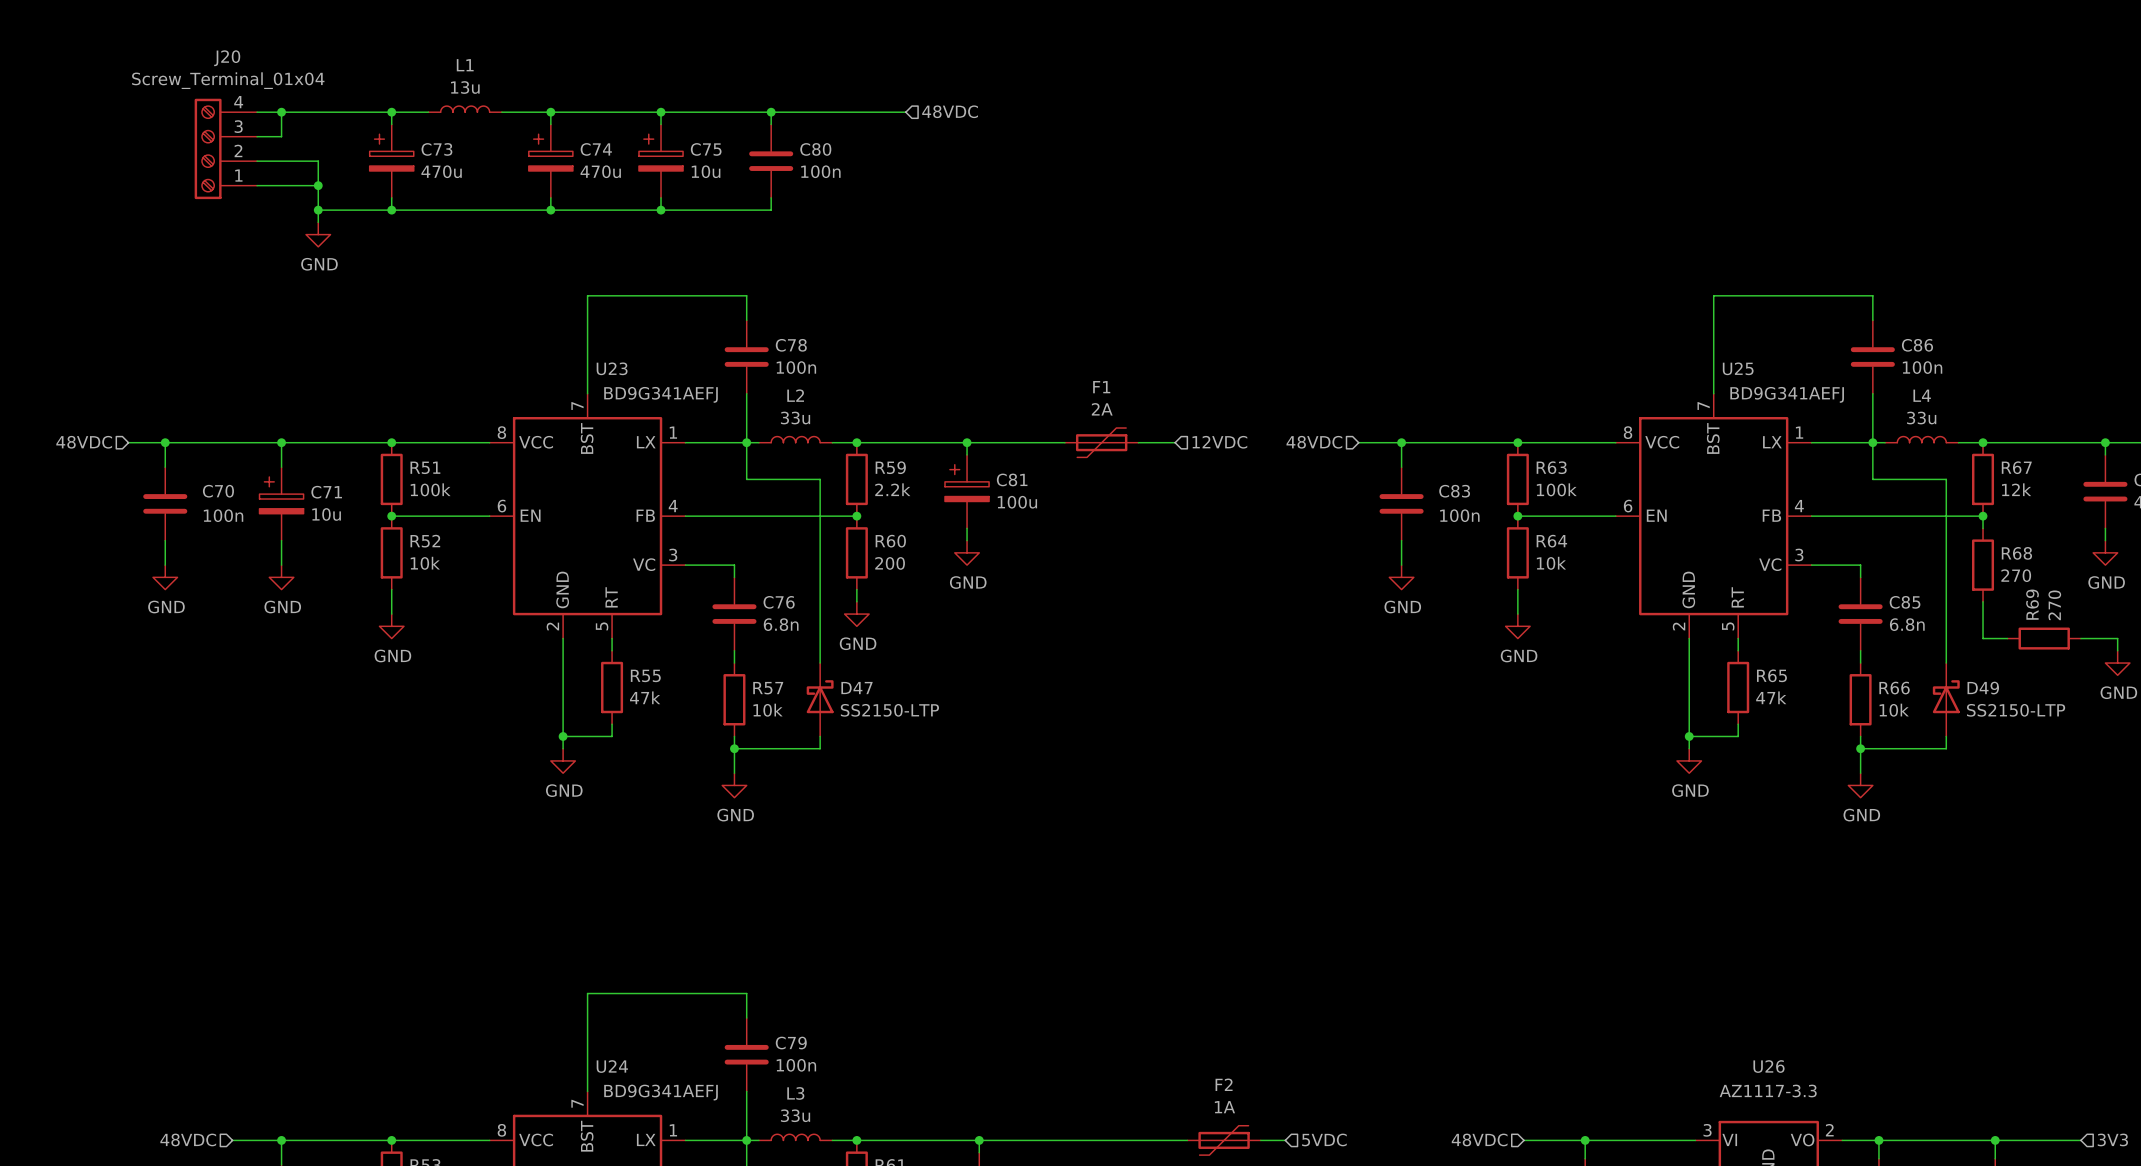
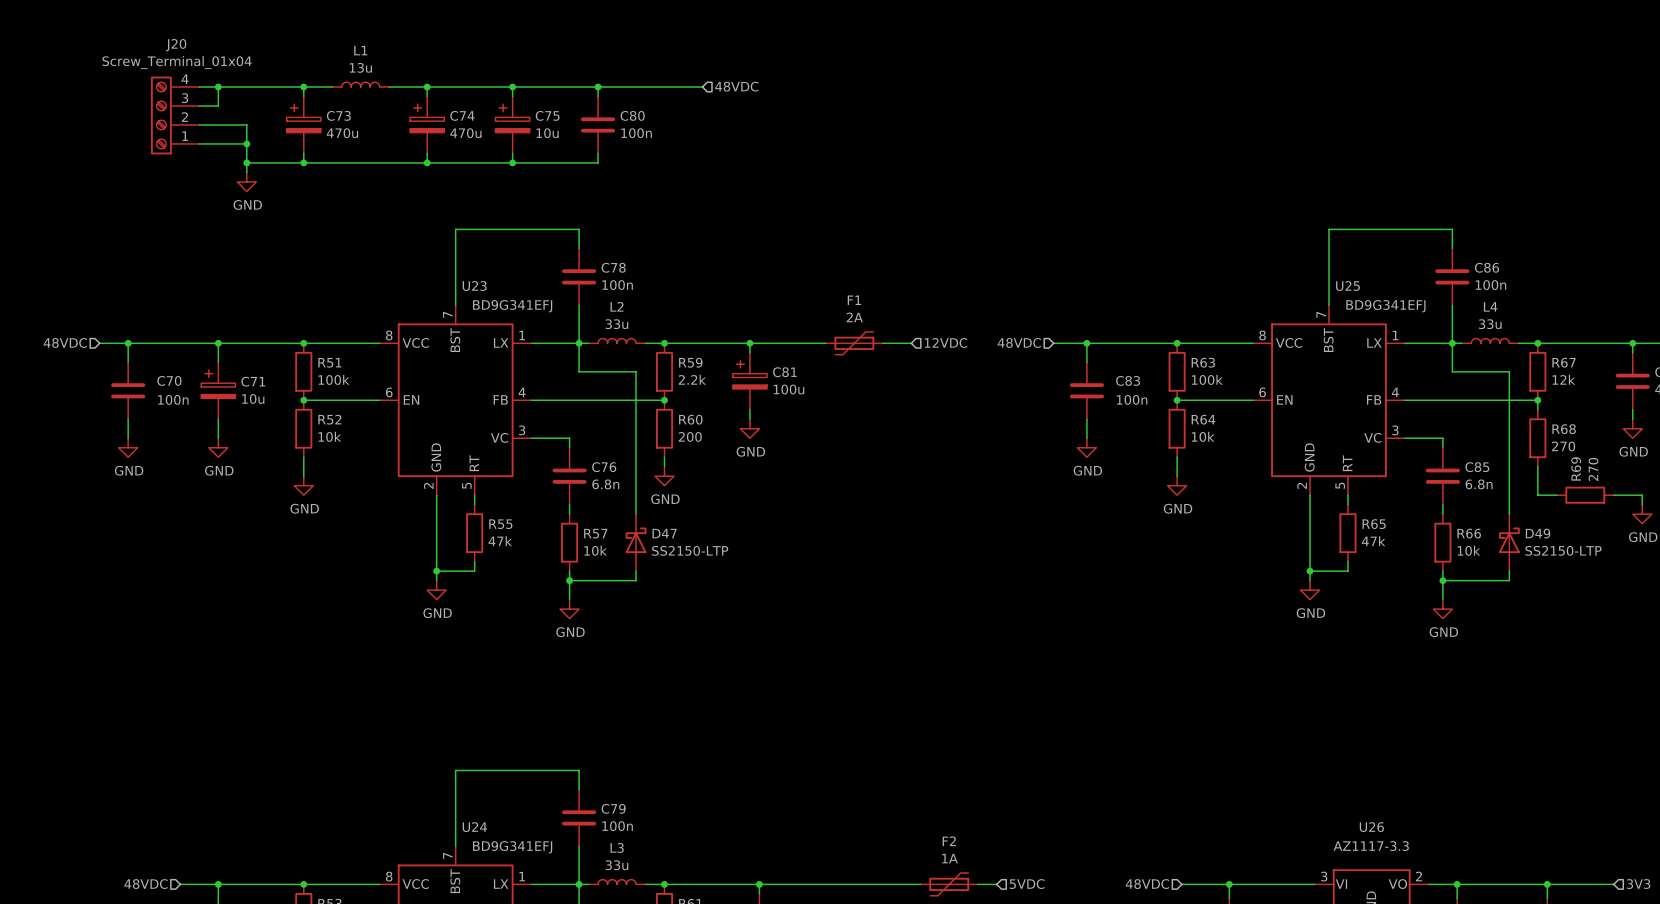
U23 value: BD9G341AEFJ (661, 394) -> BD9G341EFJ (512, 306)
U25 value: BD9G341AEFJ (1787, 394) -> BD9G341EFJ (1385, 306)
U24 value: BD9G341AEFJ (661, 1092) -> BD9G341EFJ (512, 847)

